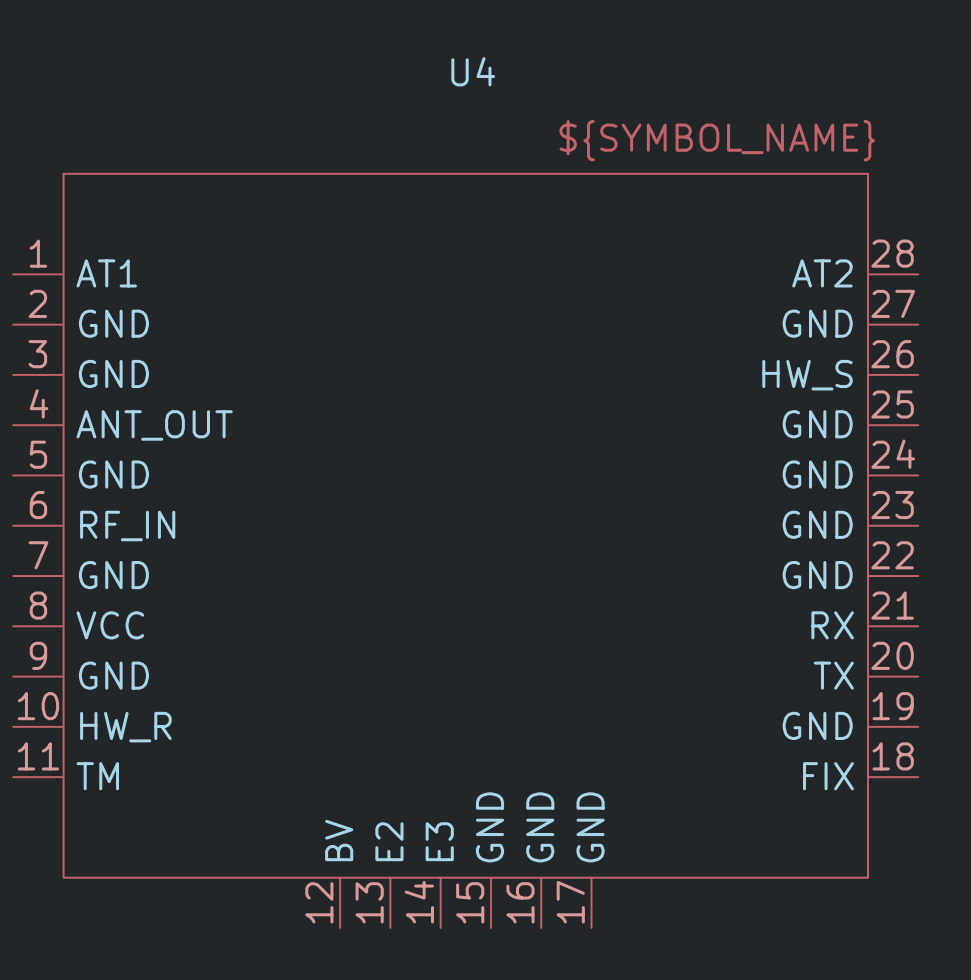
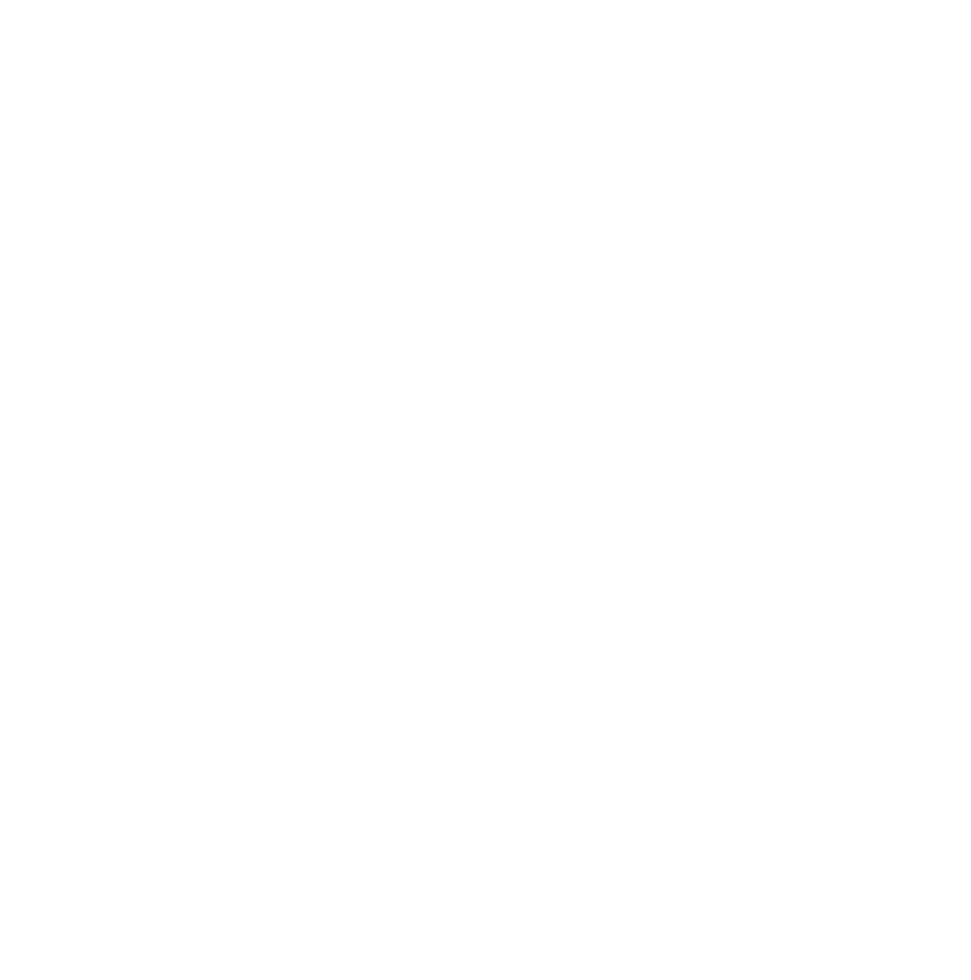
U4: (465, 550) -> none

